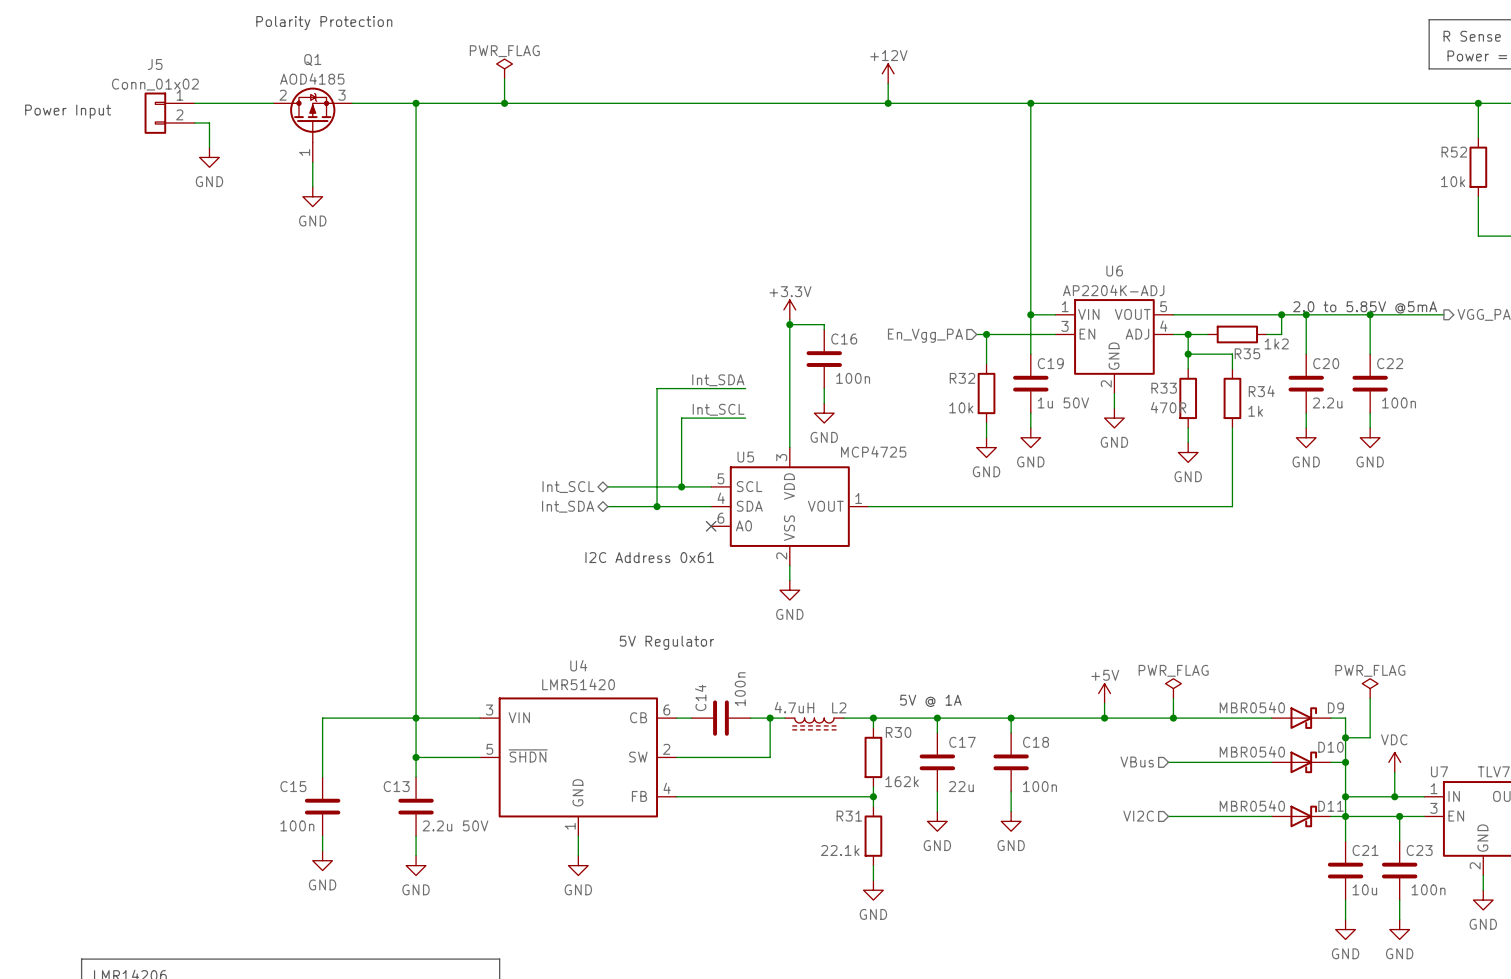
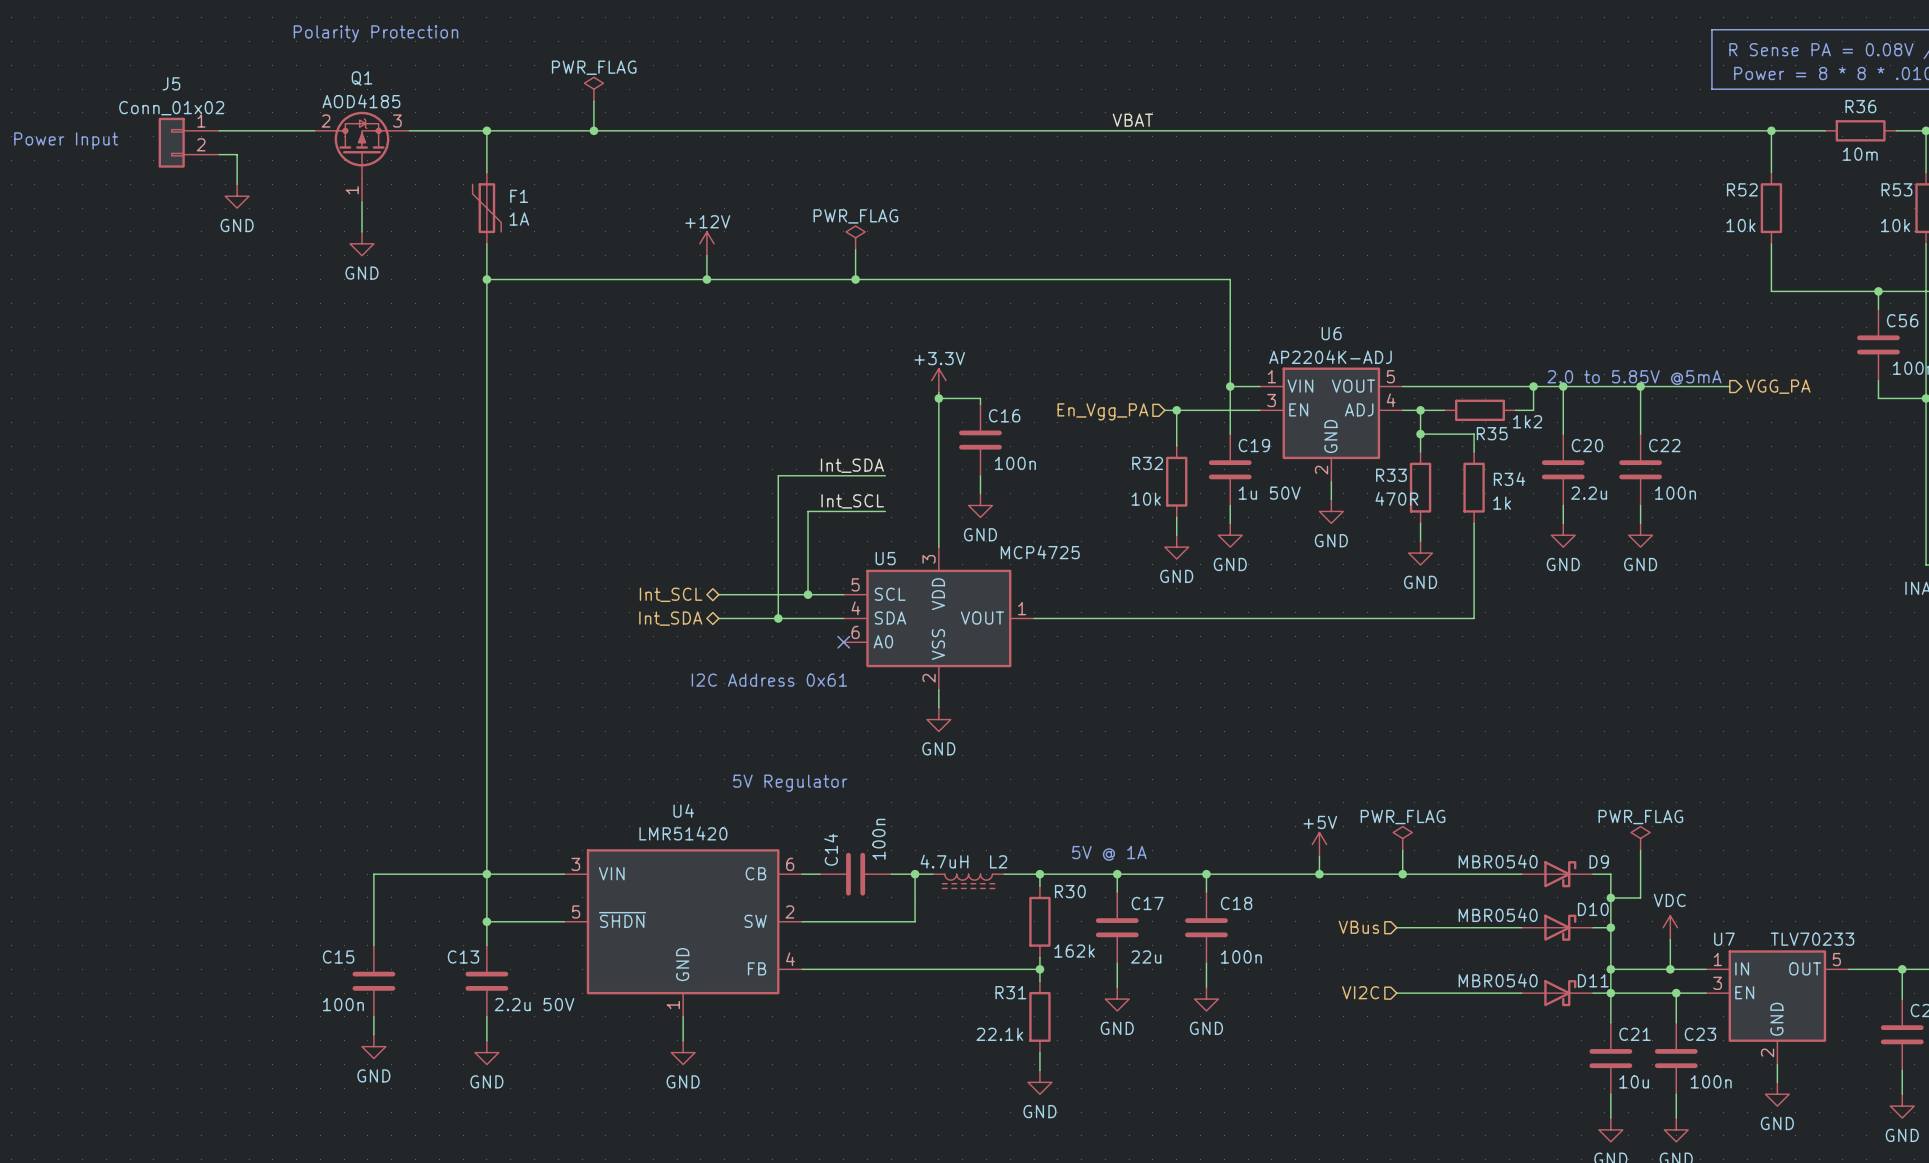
power symbol: +12V (888, 73) -> none
wire: (888, 83) (888, 103) -> none
label: none -> VBAT (1132, 120)
junction: (888, 103) -> none
wire: (1030, 103) (1030, 226) -> (486, 279) (1230, 279)
junction: (1030, 103) -> none
F1: none -> 1A (486, 208)
power symbol: none -> PWR_FLAG (855, 237)
power symbol: none -> +12V (706, 243)
wire: none -> (855, 249) (855, 279)
wire: none -> (706, 255) (706, 279)
junction: none -> (486, 279)
junction: none -> (706, 279)
junction: none -> (855, 279)

